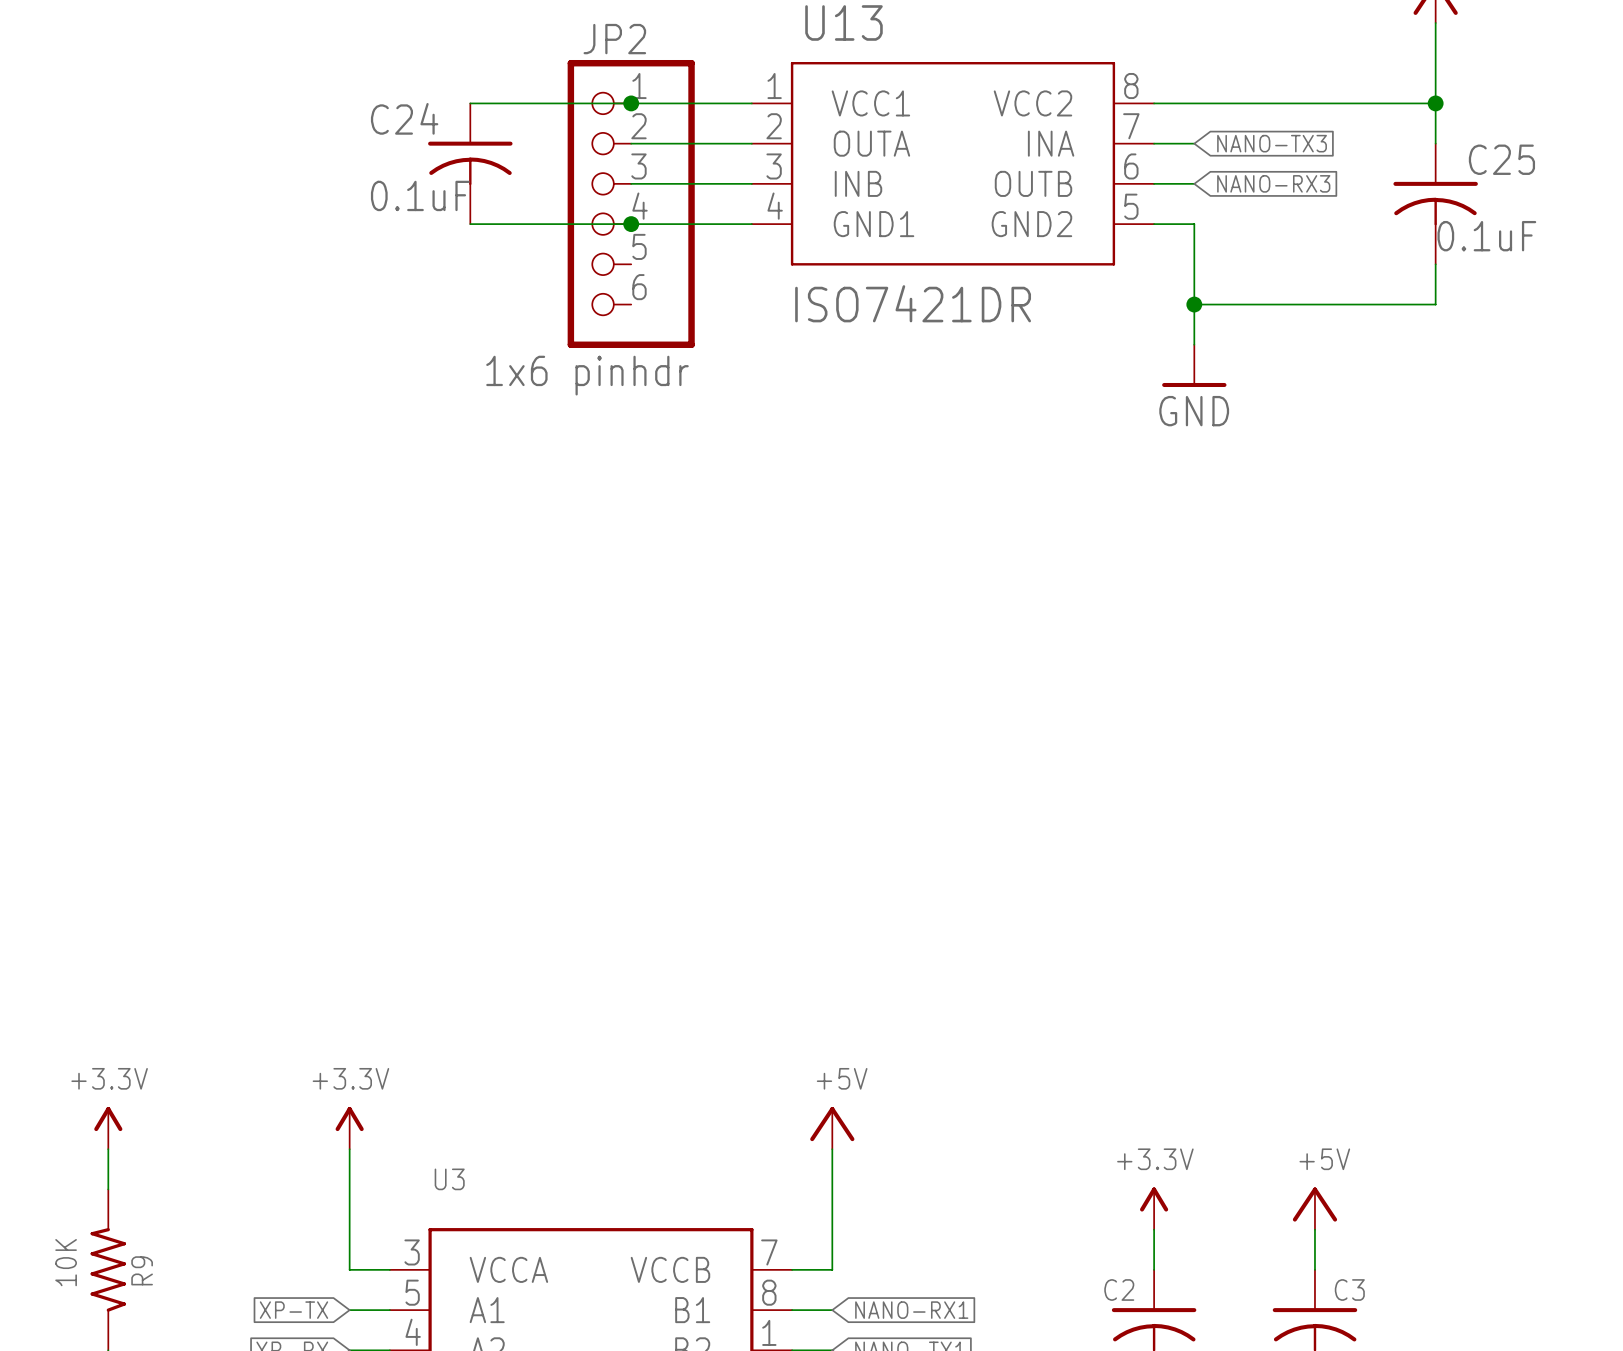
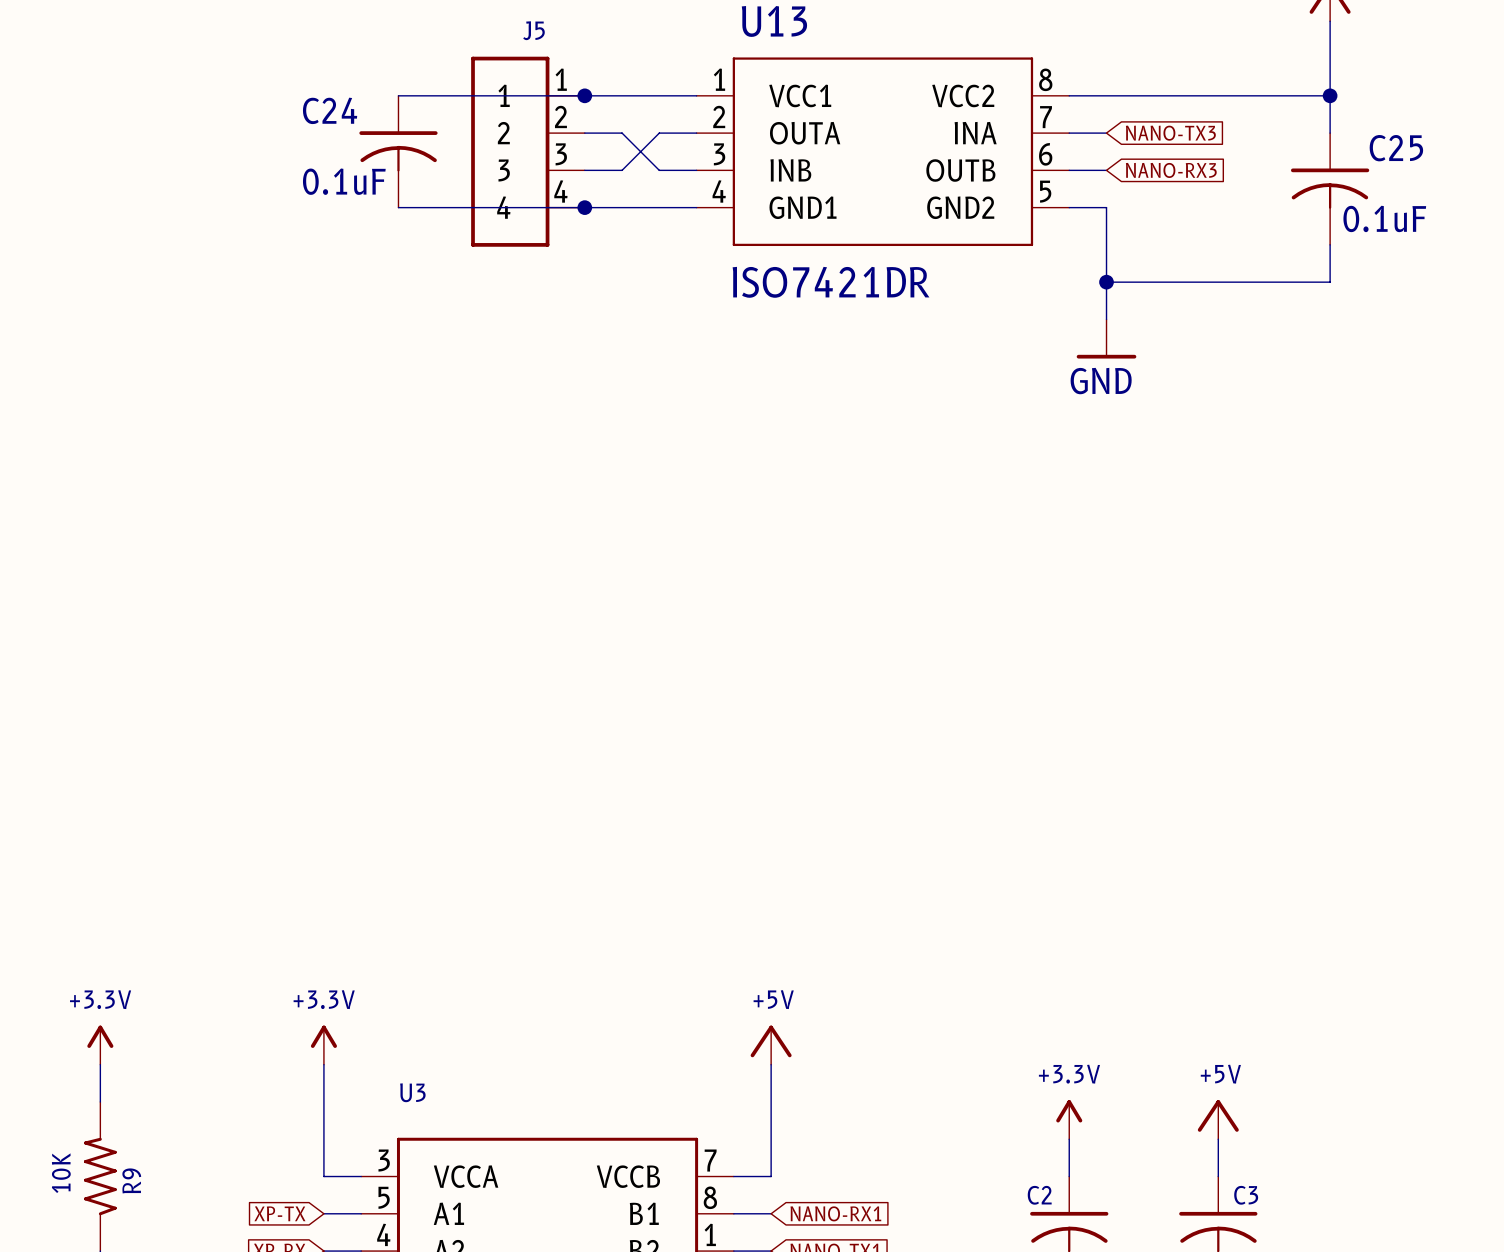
wire: none -> (398, 95) (435, 95)
wire: (671, 143) (711, 143) -> (622, 133) (659, 170)
C24 position: (470, 163) -> (398, 151)
J5: none -> (527, 151)
wire: (671, 183) (711, 183) -> (622, 170) (659, 133)
JP2: 1x6 pinhdr (631, 203) -> none
wire: none -> (398, 207) (435, 207)

